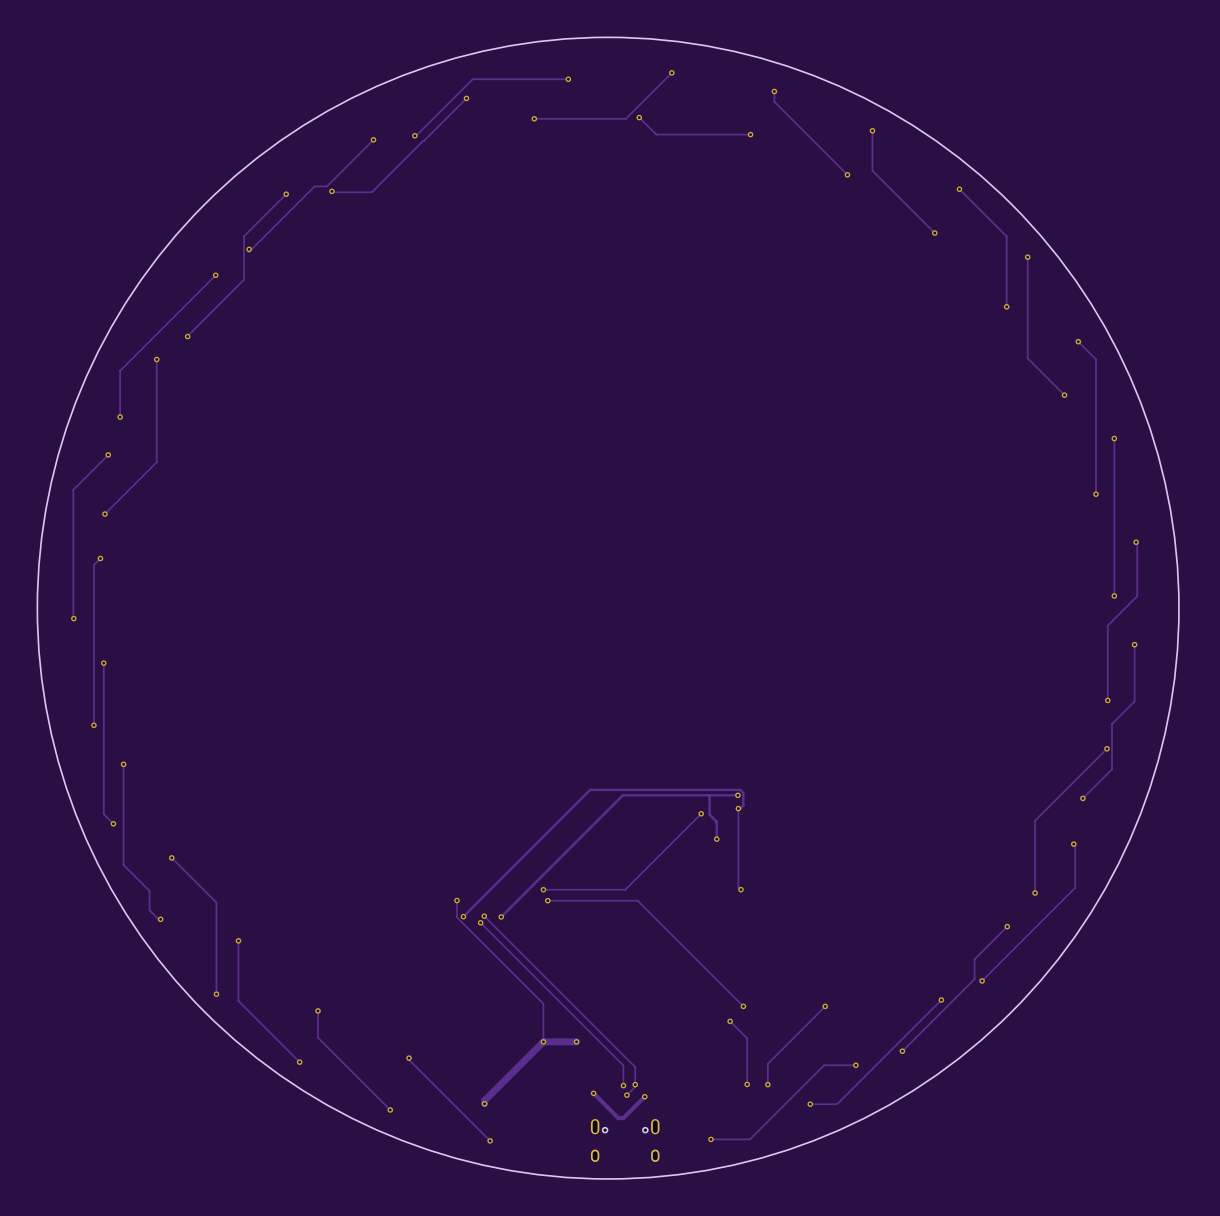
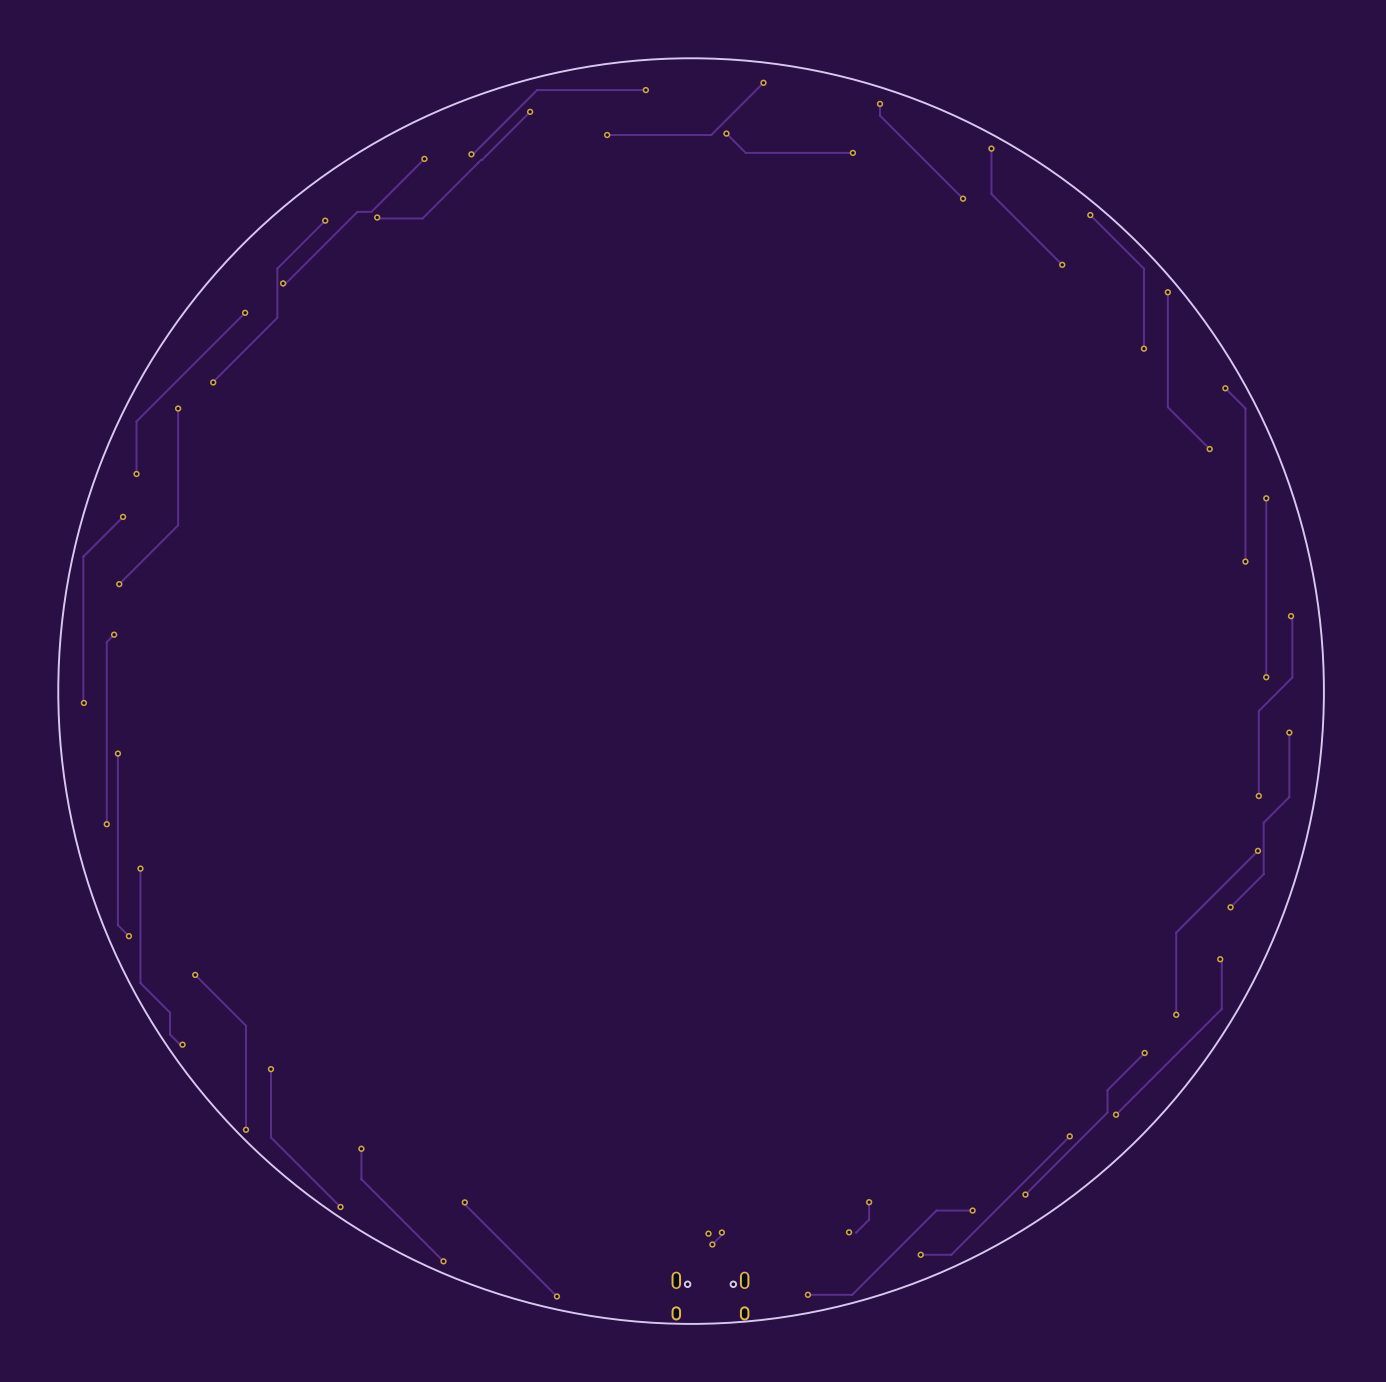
round board edge size: [37, 37, 1180, 1180] -> [57, 57, 1325, 1325]
track: (709, 795) (709, 814) (716, 821) (716, 839) -> none
track: (737, 795) (622, 795) (501, 916) -> none
via: (737, 795) -> none
via: (738, 808) -> none
track: (701, 813) (625, 889) (543, 889) -> none
via: (701, 813) -> none
via: (716, 839) -> none
via: (543, 889) -> none
track: (740, 889) (738, 887) (738, 808) (743, 805) (743, 793) (740, 789) (590, 789) (463, 916) -> none
via: (740, 889) -> none
track: (457, 900) (457, 917) (543, 1003) (543, 1041) -> none
via: (457, 900) -> none
track: (547, 900) (637, 900) (743, 1006) -> none
via: (547, 900) -> none
via: (463, 916) -> none
track: (484, 916) (635, 1067) (635, 1084) -> none
via: (484, 916) -> none
via: (501, 916) -> none
track: (480, 922) (623, 1065) (623, 1085) -> none
via: (480, 922) -> none
via: (743, 1006) -> none
track: (825, 1006) (767, 1063) (767, 1084) -> none
via: (825, 1006) -> none
track: (730, 1021) (747, 1038) (747, 1084) -> none
via: (730, 1021) -> none
track: (543, 1041) (484, 1100) (484, 1103) -> none
via: (543, 1041) -> none
track: (576, 1041) (543, 1041) -> none
via: (576, 1041) -> none
track: none -> (869, 1202) (869, 1219) (855, 1232)
via: none -> (869, 1202)
via: (767, 1084) -> none
track: (593, 1093) (618, 1118) (623, 1118) (644, 1096) -> none
via: (593, 1093) -> none
via: (644, 1096) -> none
via: (484, 1103) -> none

